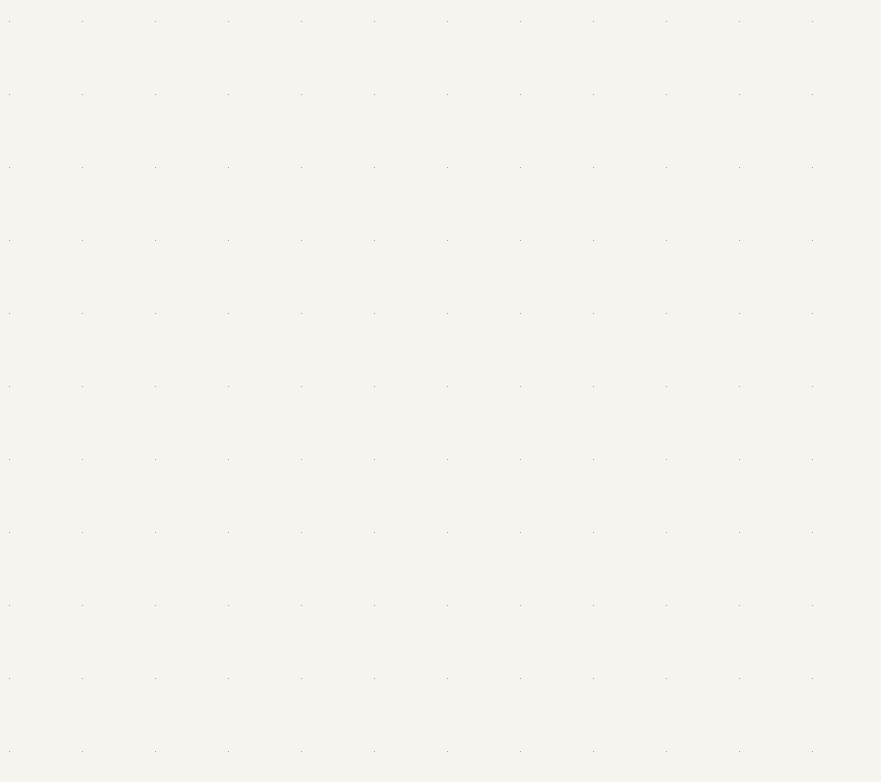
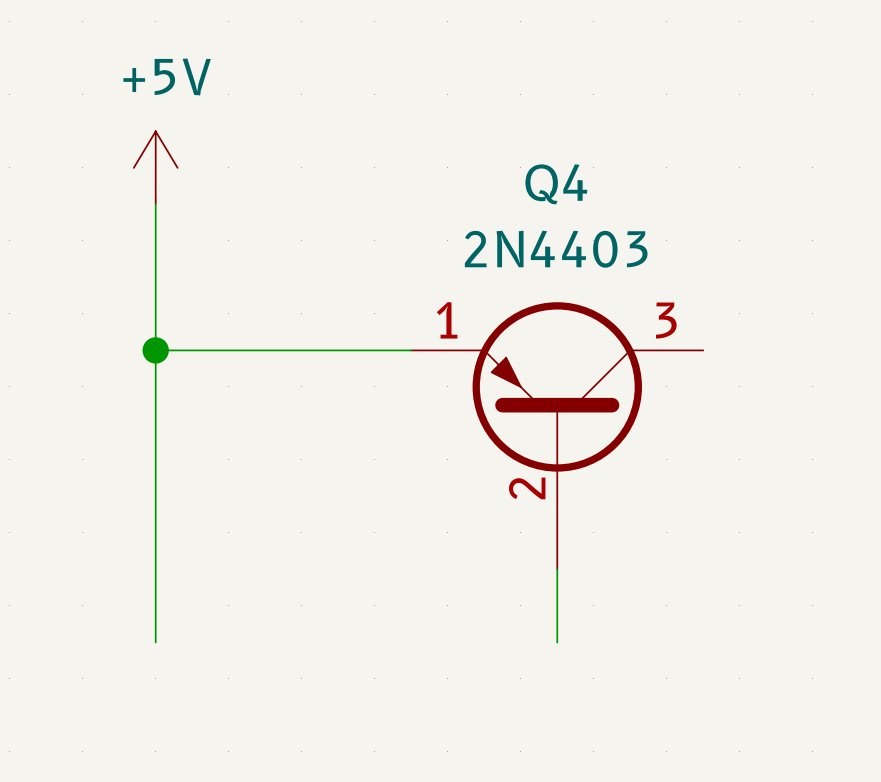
power symbol: none -> +5V (155, 167)
wire: none -> (155, 204) (155, 642)
wire: none -> (155, 350) (411, 350)
junction: none -> (155, 350)
Q4: none -> 2N4403 (557, 435)
wire: none -> (557, 569) (557, 642)

